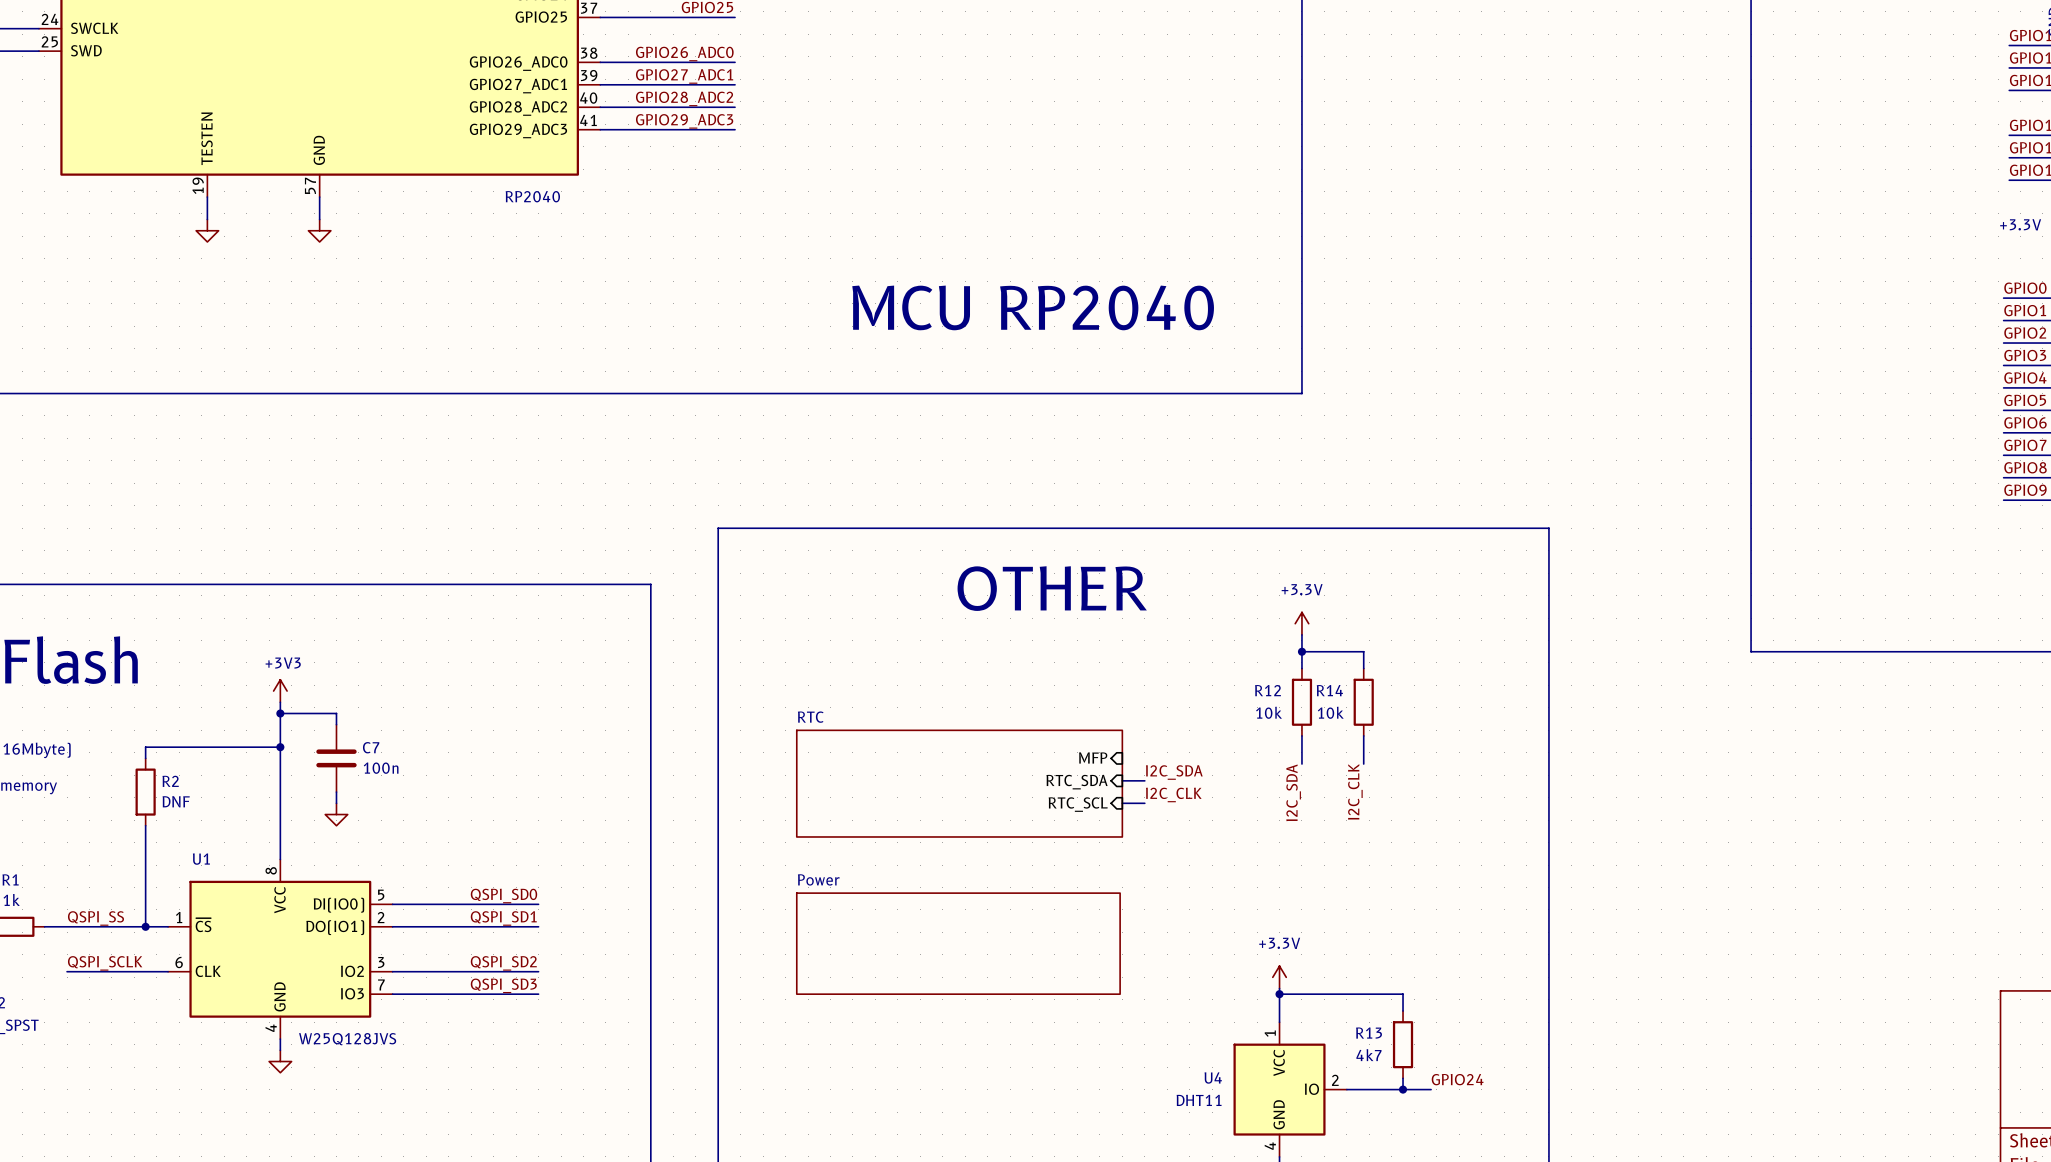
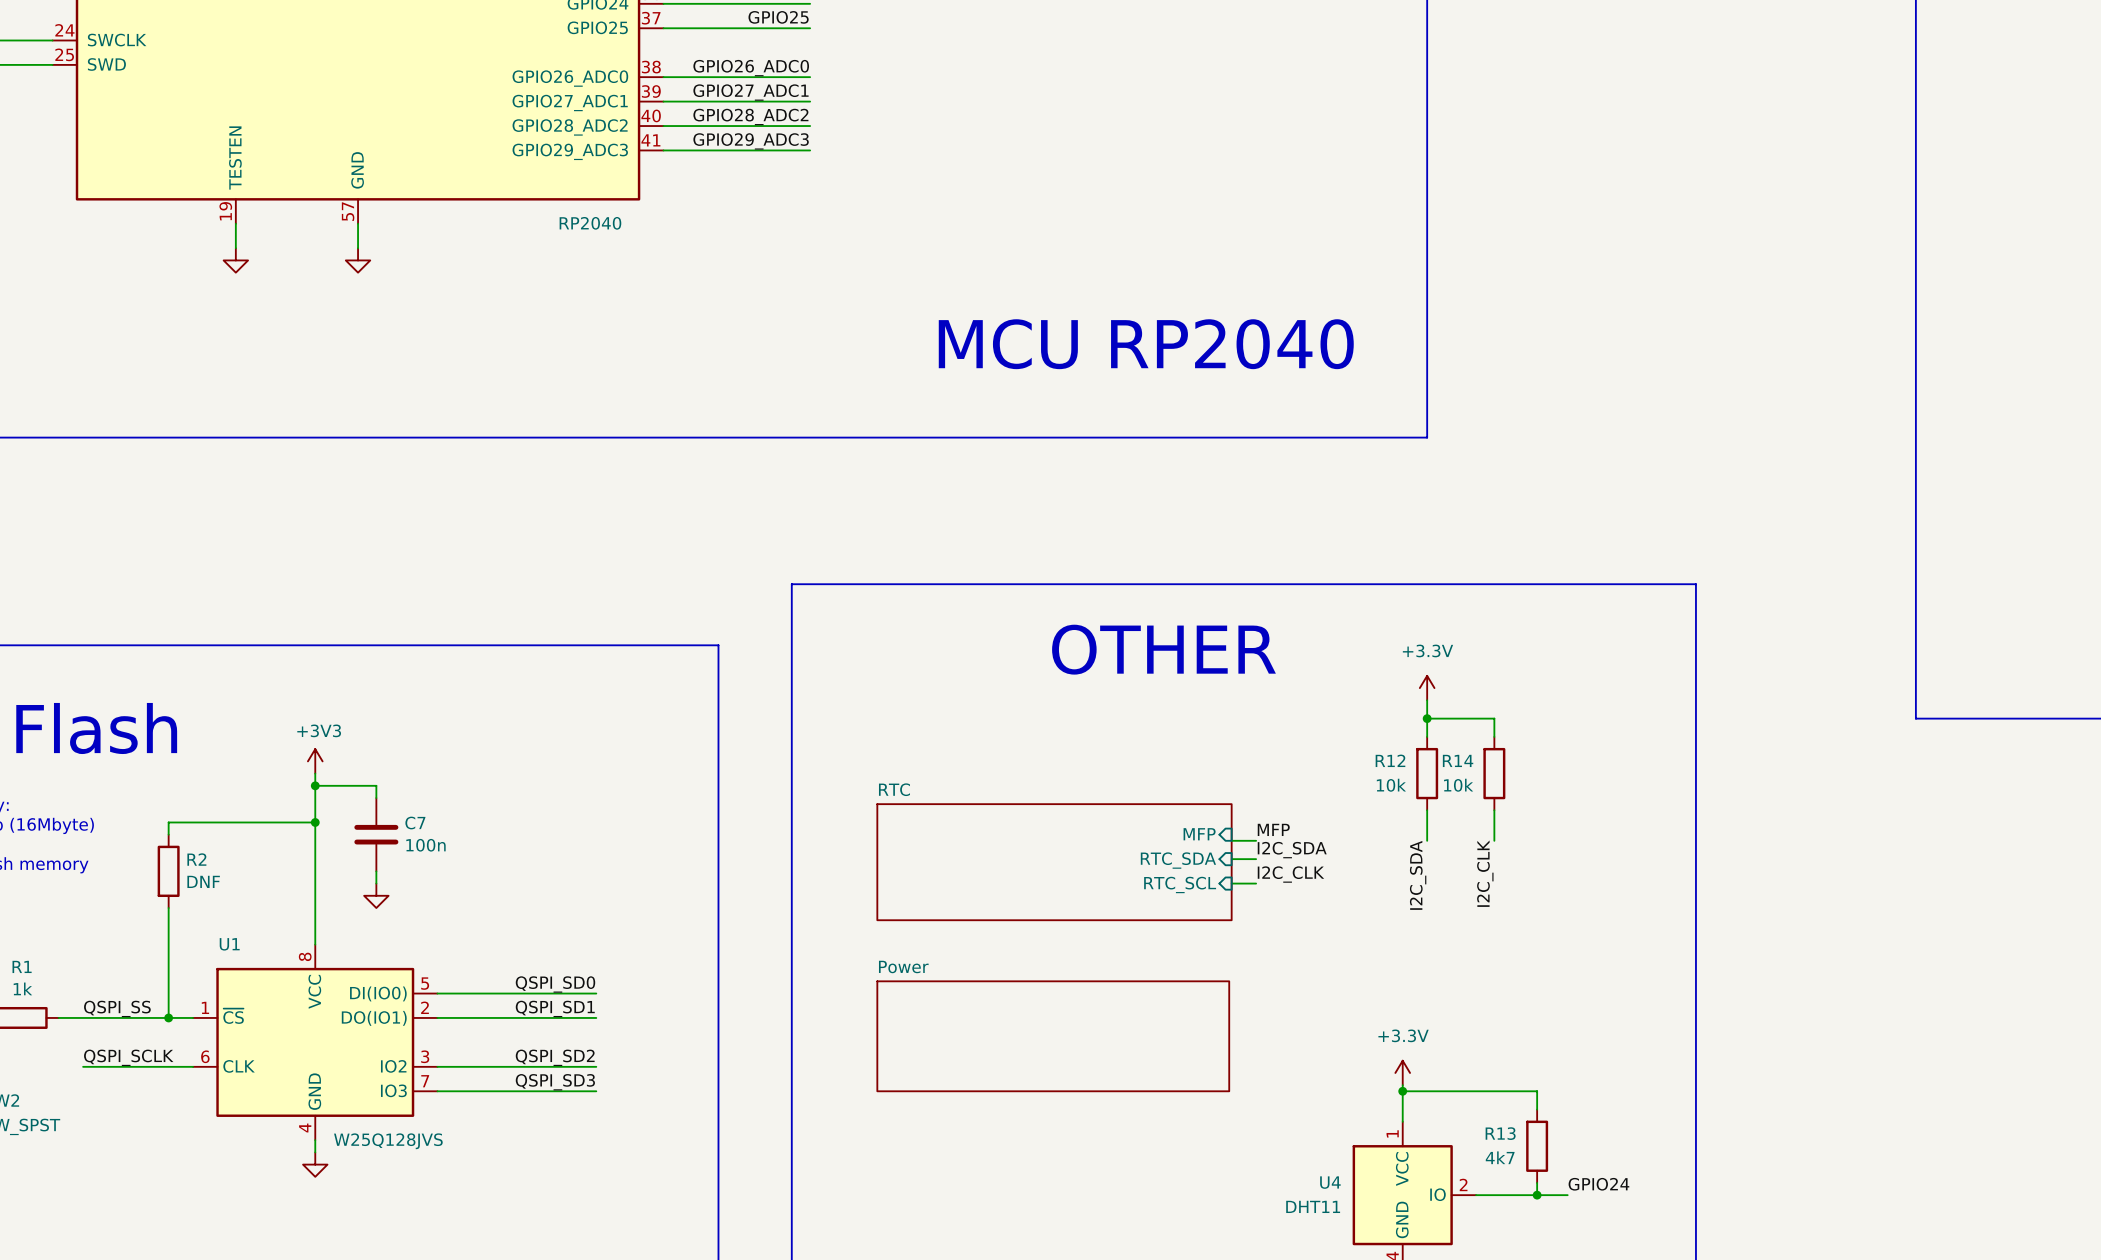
label: none -> MFP (1273, 829)
wire: none -> (1231, 840) (1256, 840)

